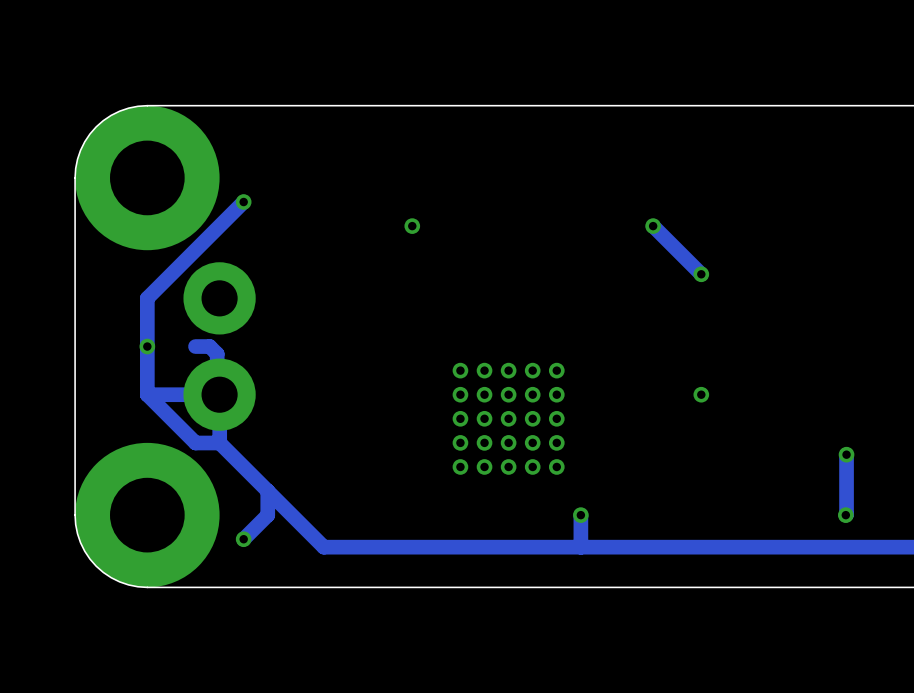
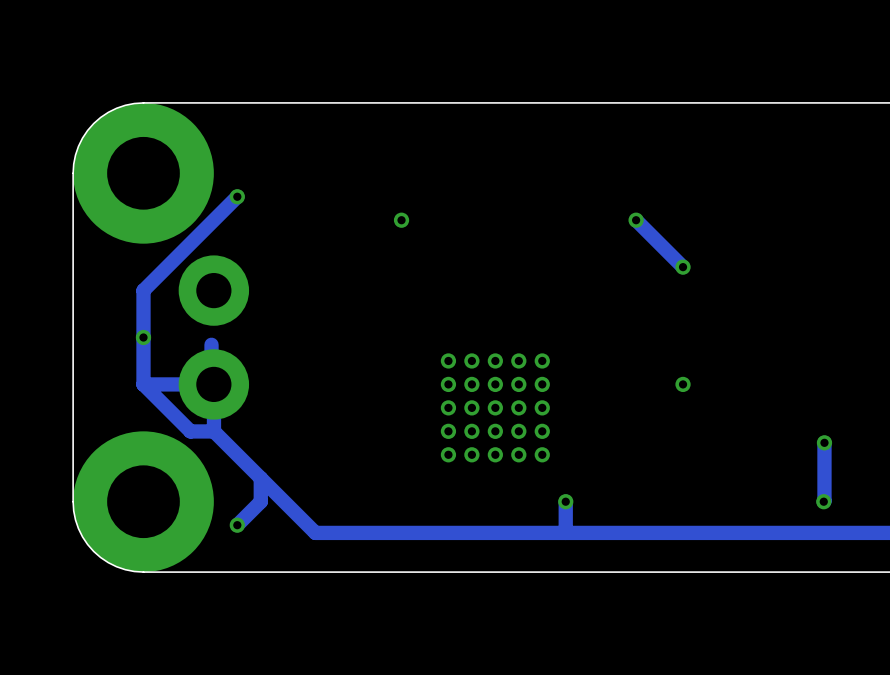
track: (195, 346) (209, 346) (217, 354) -> none

